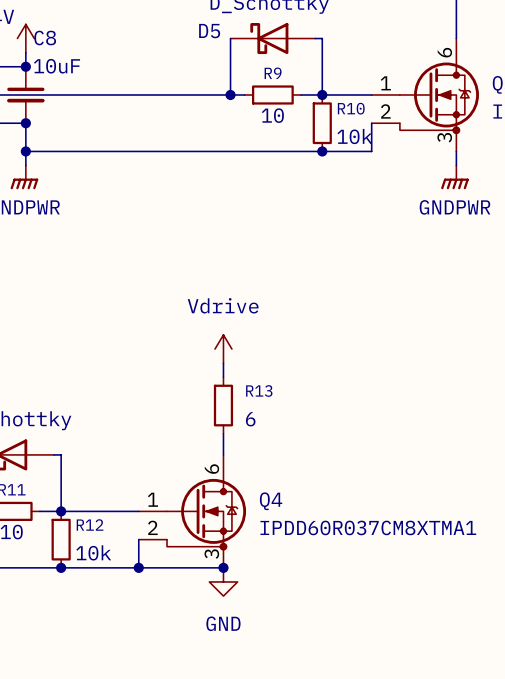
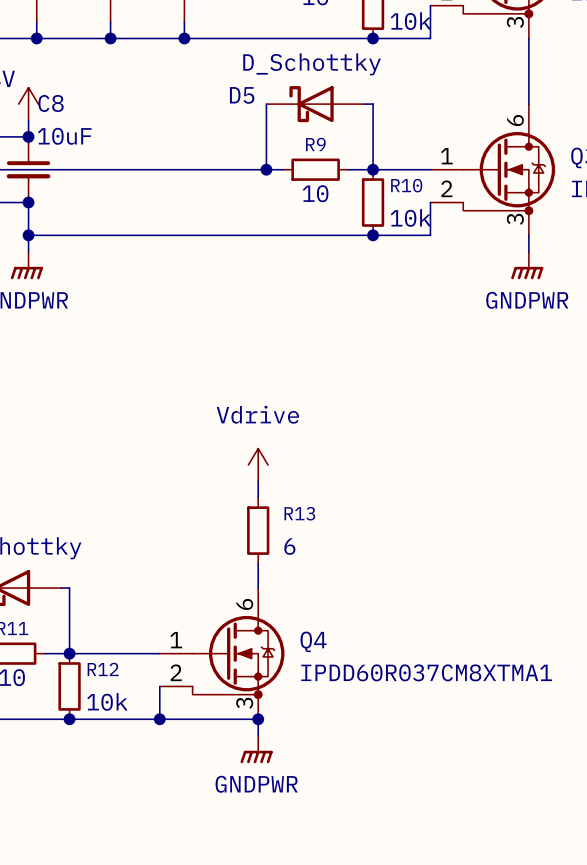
power symbol: GND (223, 581) -> none
power symbol: none -> GNDPWR (256, 749)

